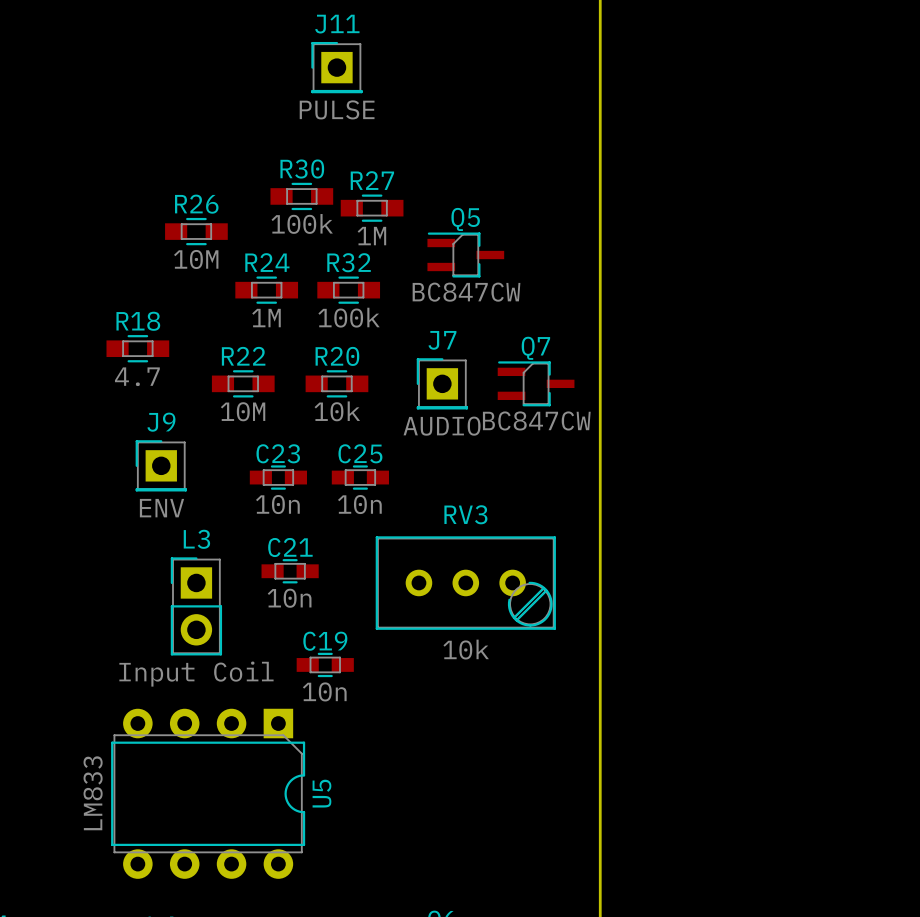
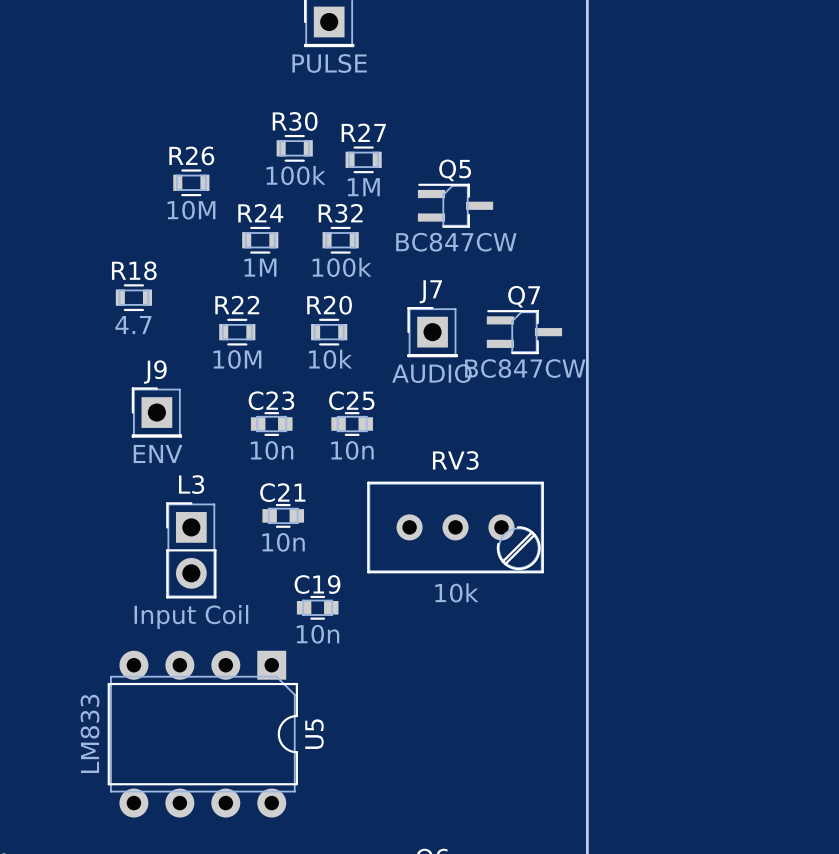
R30 footprint: [270, 182, 334, 211] -> [276, 134, 313, 162]
R27 footprint: [340, 194, 404, 222] -> [345, 146, 382, 174]
R26 footprint: [165, 217, 228, 246] -> [173, 169, 210, 197]
R24 footprint: [235, 276, 299, 304] -> [242, 226, 279, 254]
R32 footprint: [317, 276, 381, 304] -> [322, 226, 359, 254]
R18 footprint: [106, 335, 170, 363] -> [115, 284, 153, 312]
R22 footprint: [211, 370, 275, 398] -> [219, 318, 256, 346]
R20 footprint: [305, 370, 369, 398] -> [311, 318, 348, 346]
C23 footprint: [249, 465, 307, 490] -> [250, 412, 293, 436]
C25 footprint: [331, 465, 389, 490] -> [331, 412, 373, 436]
C21 footprint: [261, 559, 319, 584] -> [262, 503, 305, 528]
C19 footprint: [296, 652, 354, 678] -> [296, 595, 339, 620]

